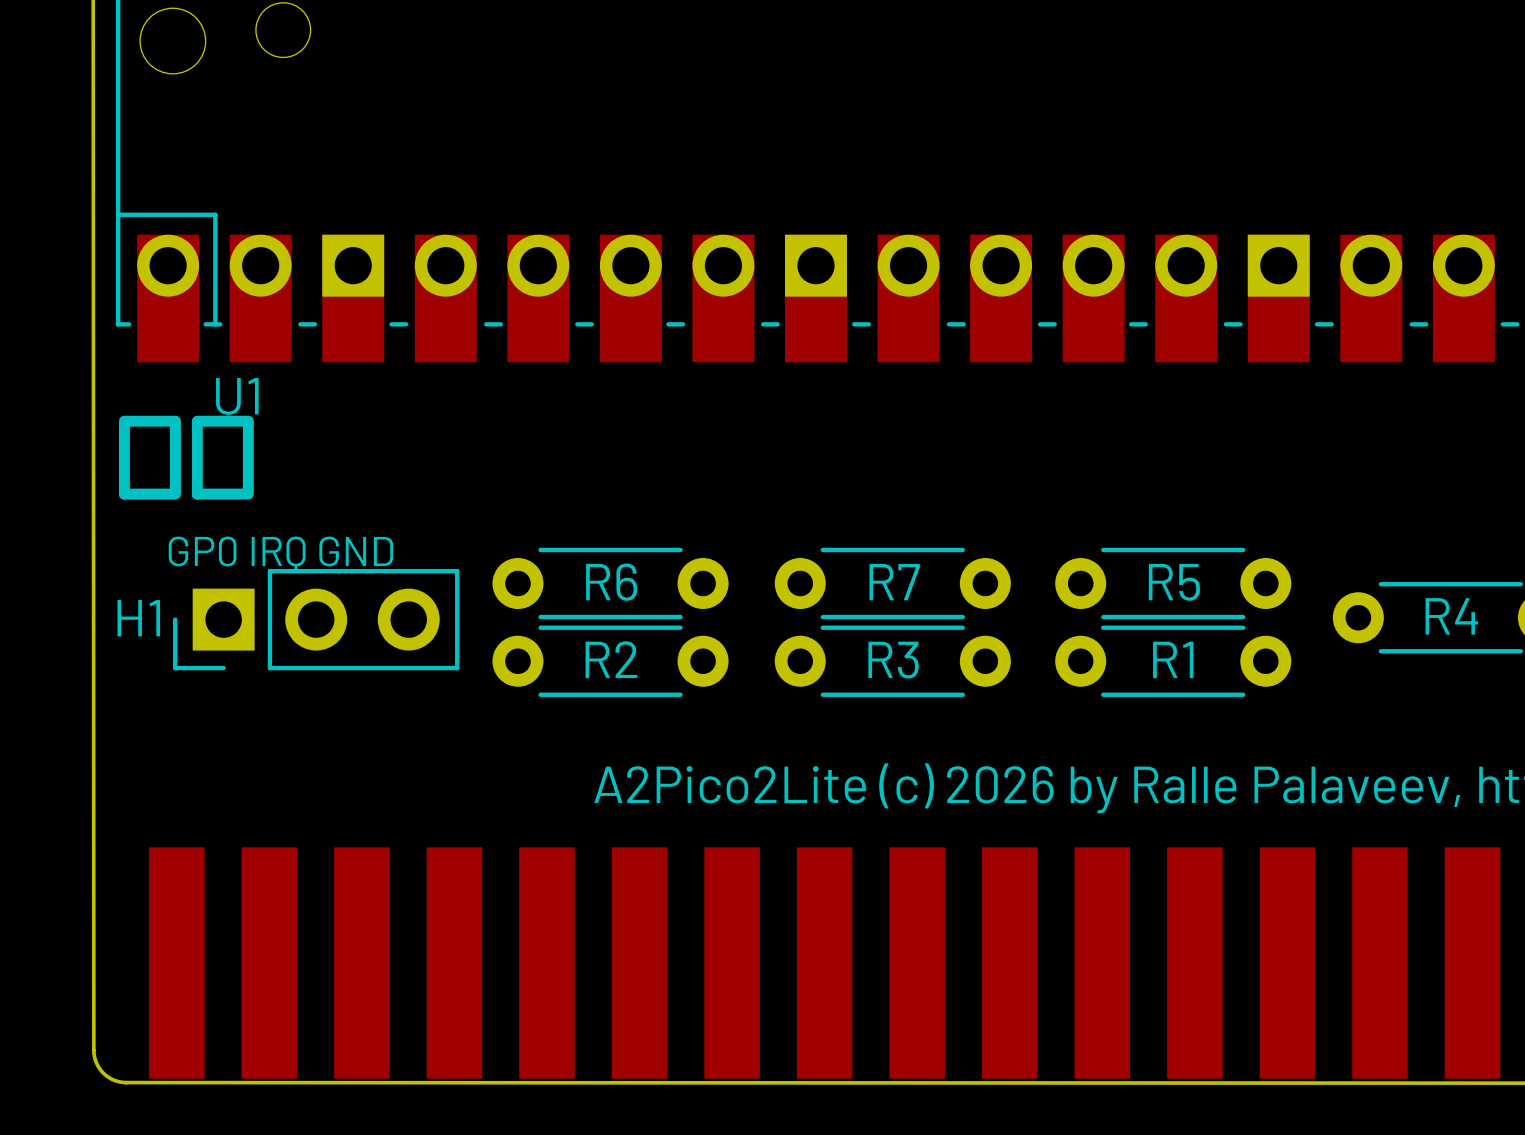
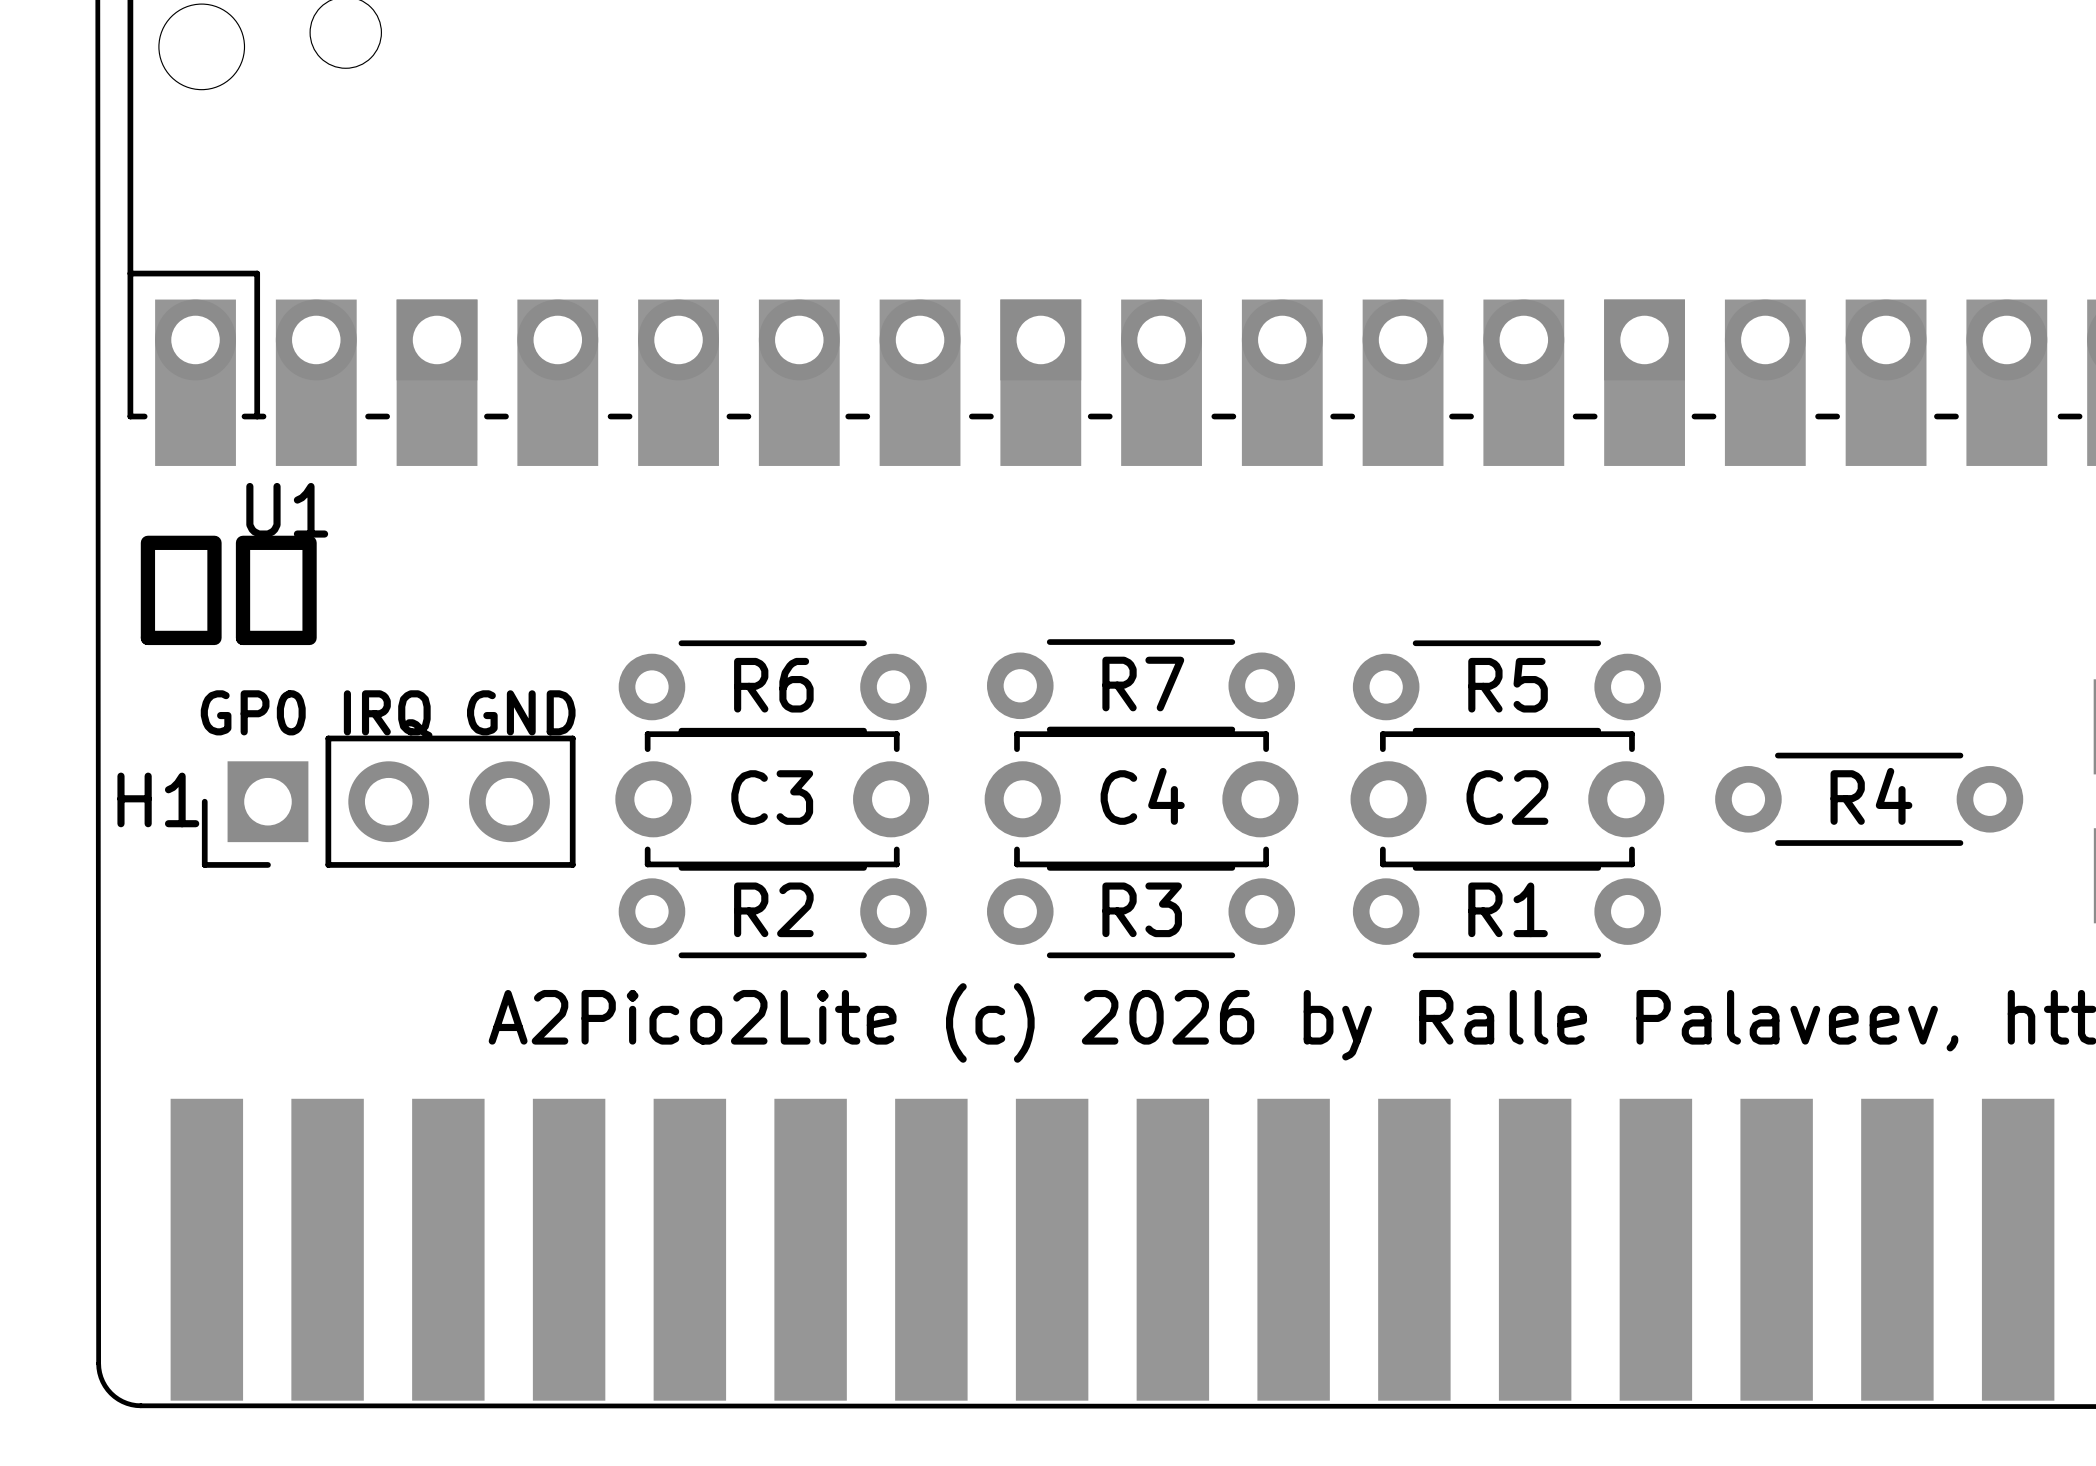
R6 position: (610, 583) -> (772, 686)
R7 position: (892, 583) -> (1141, 685)
R5 position: (1173, 583) -> (1506, 686)
C3: none -> (772, 799)
C4: none -> (1141, 799)
C2: none -> (1507, 799)
R2 position: (610, 661) -> (772, 911)
R3 position: (892, 661) -> (1141, 911)
R1 position: (1173, 661) -> (1506, 911)

